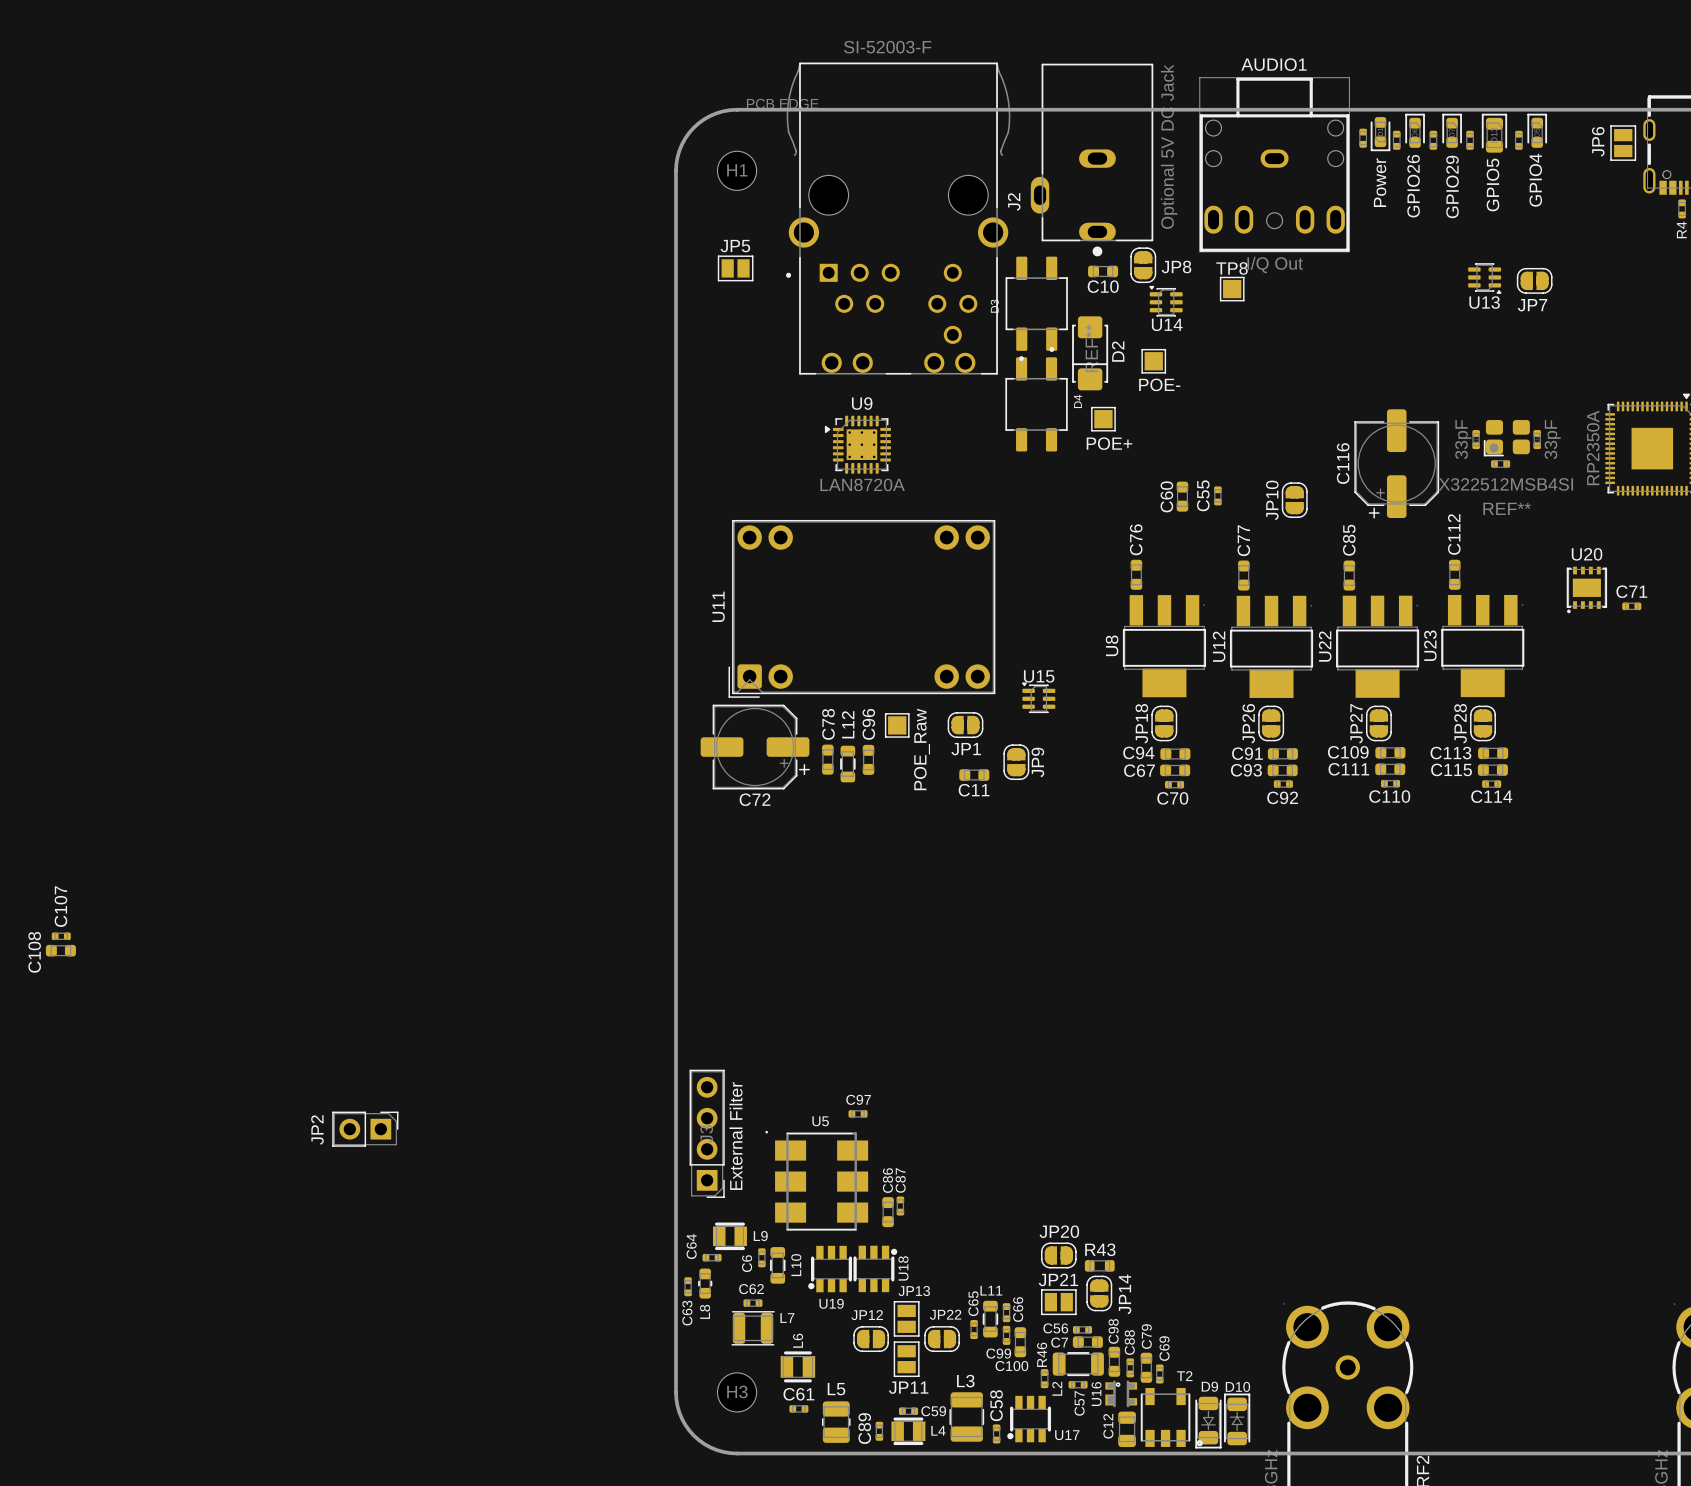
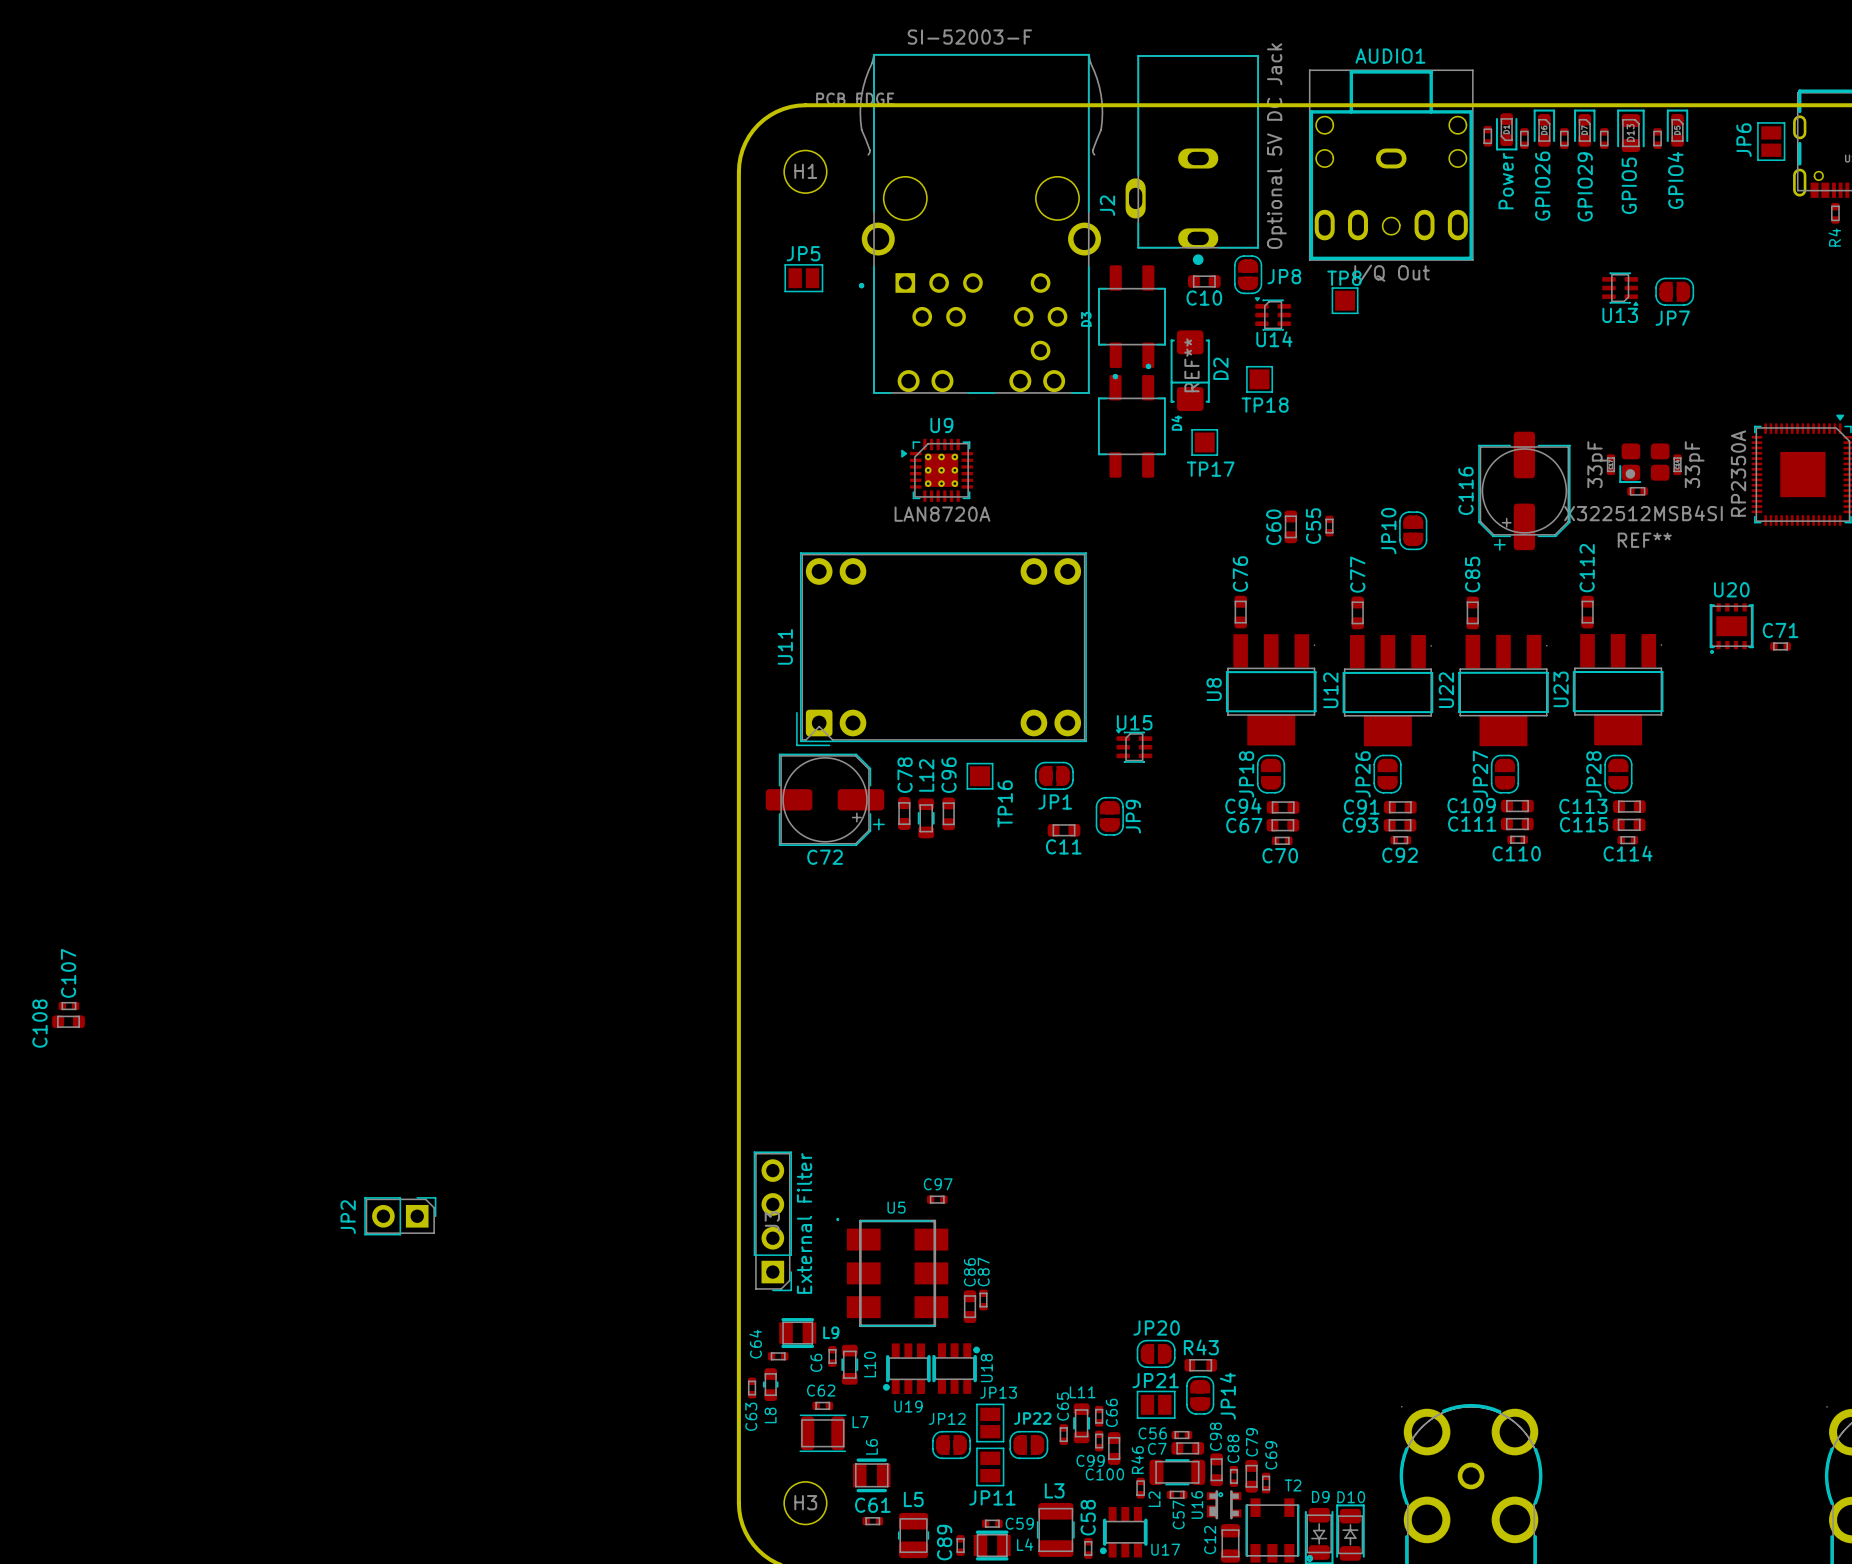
POE- name: POE- (1159, 384) -> TP18 (1265, 405)
POE+ name: POE+ (1109, 443) -> TP17 (1210, 469)
POE_Raw name: POE_Raw (922, 749) -> TP16 (1005, 803)

